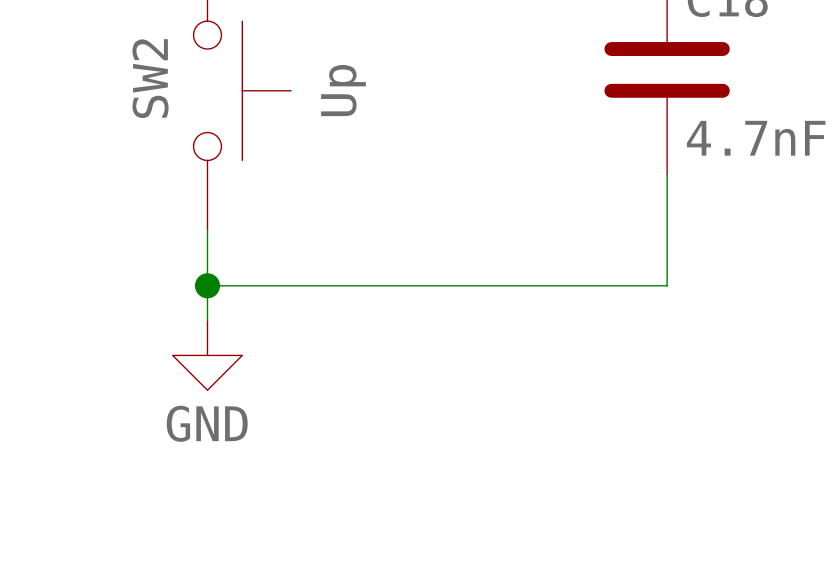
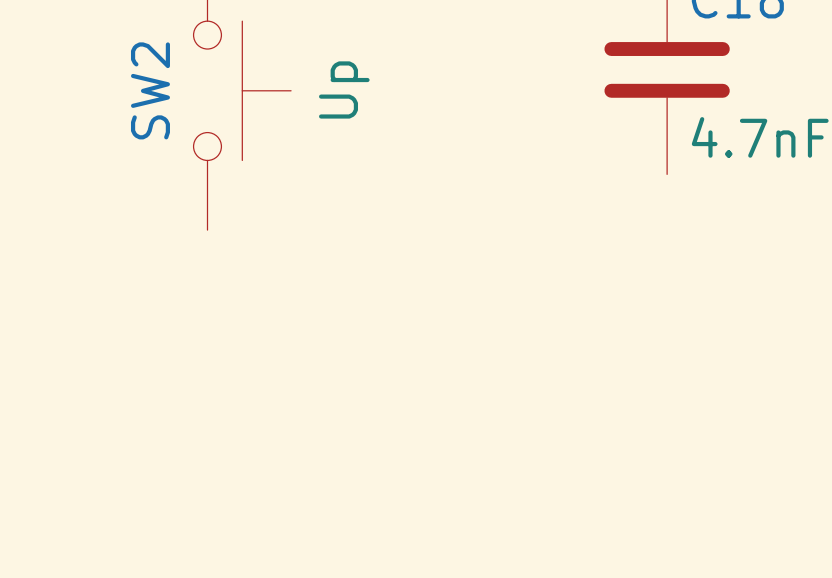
wire: (667, 174) (667, 285) (207, 285) -> none
wire: (207, 230) (207, 320) -> none
junction: (207, 285) -> none
power symbol: GND (207, 355) -> none

